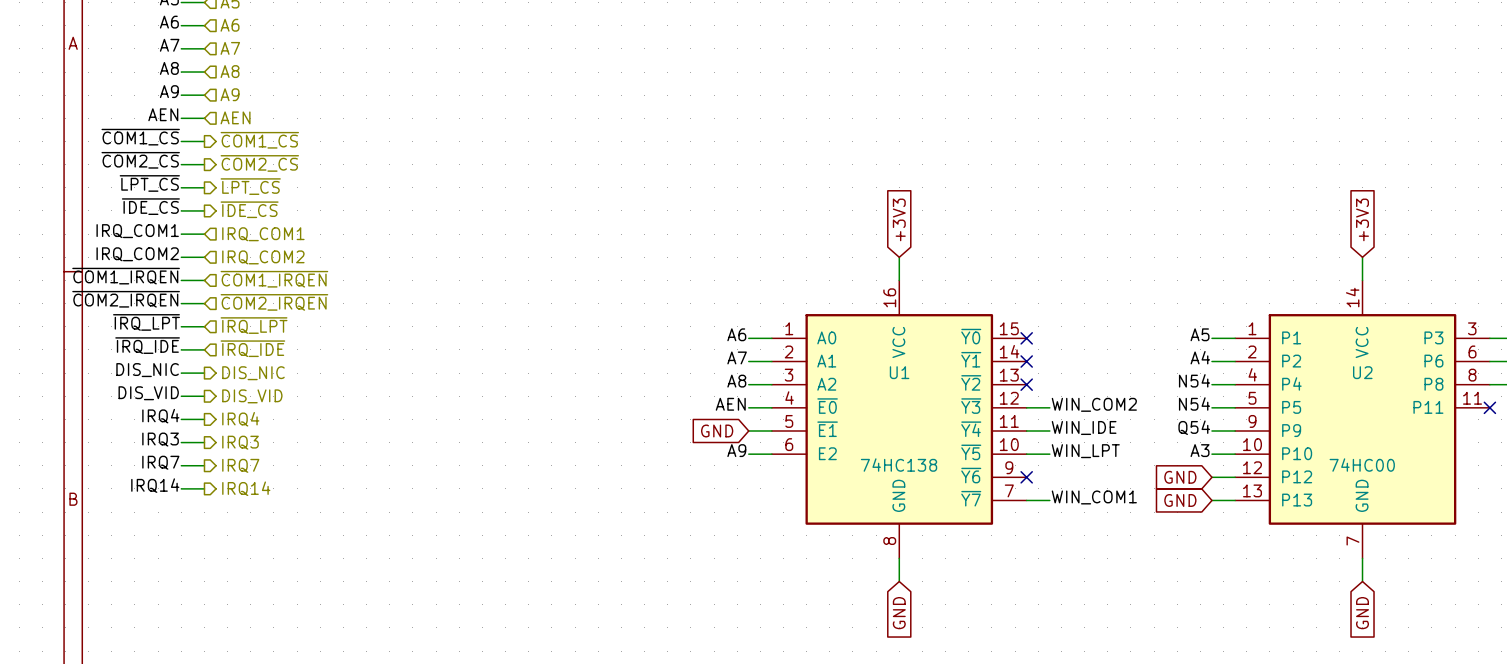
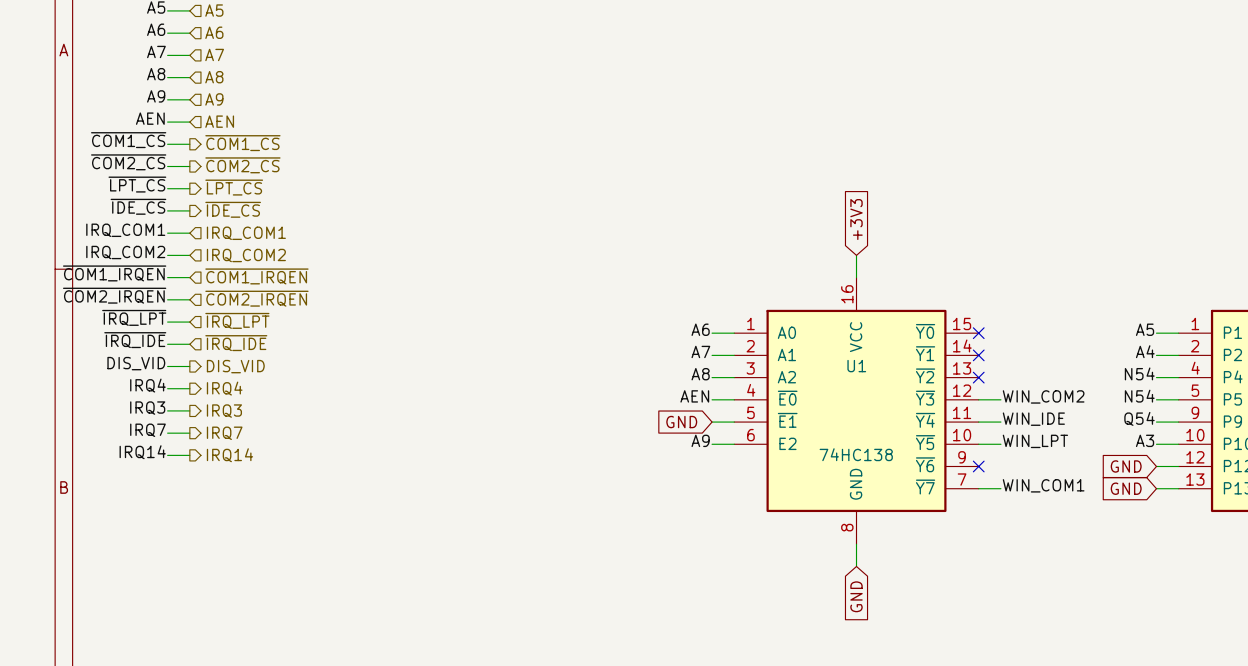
label: DIS_NIC (147, 370) -> DIS_VID (136, 363)
hierarchical label: DIS_NIC (253, 373) -> DIS_VID (235, 366)
label: DIS_VID (148, 393) -> IRQ4 (147, 385)
hierarchical label: DIS_VID (252, 396) -> IRQ4 (224, 388)
label: IRQ4 (160, 416) -> IRQ3 (147, 408)
hierarchical label: IRQ4 (240, 419) -> IRQ3 (224, 411)
label: IRQ3 (160, 439) -> IRQ7 (147, 430)
hierarchical label: IRQ3 (240, 442) -> IRQ7 (224, 433)
label: IRQ7 (160, 462) -> IRQ14 (142, 452)
hierarchical label: IRQ7 (240, 465) -> IRQ14 (229, 455)
label: IRQ14 (155, 485) -> none
wire: (181, 488) (204, 488) -> none
hierarchical label: IRQ14 (246, 488) -> none

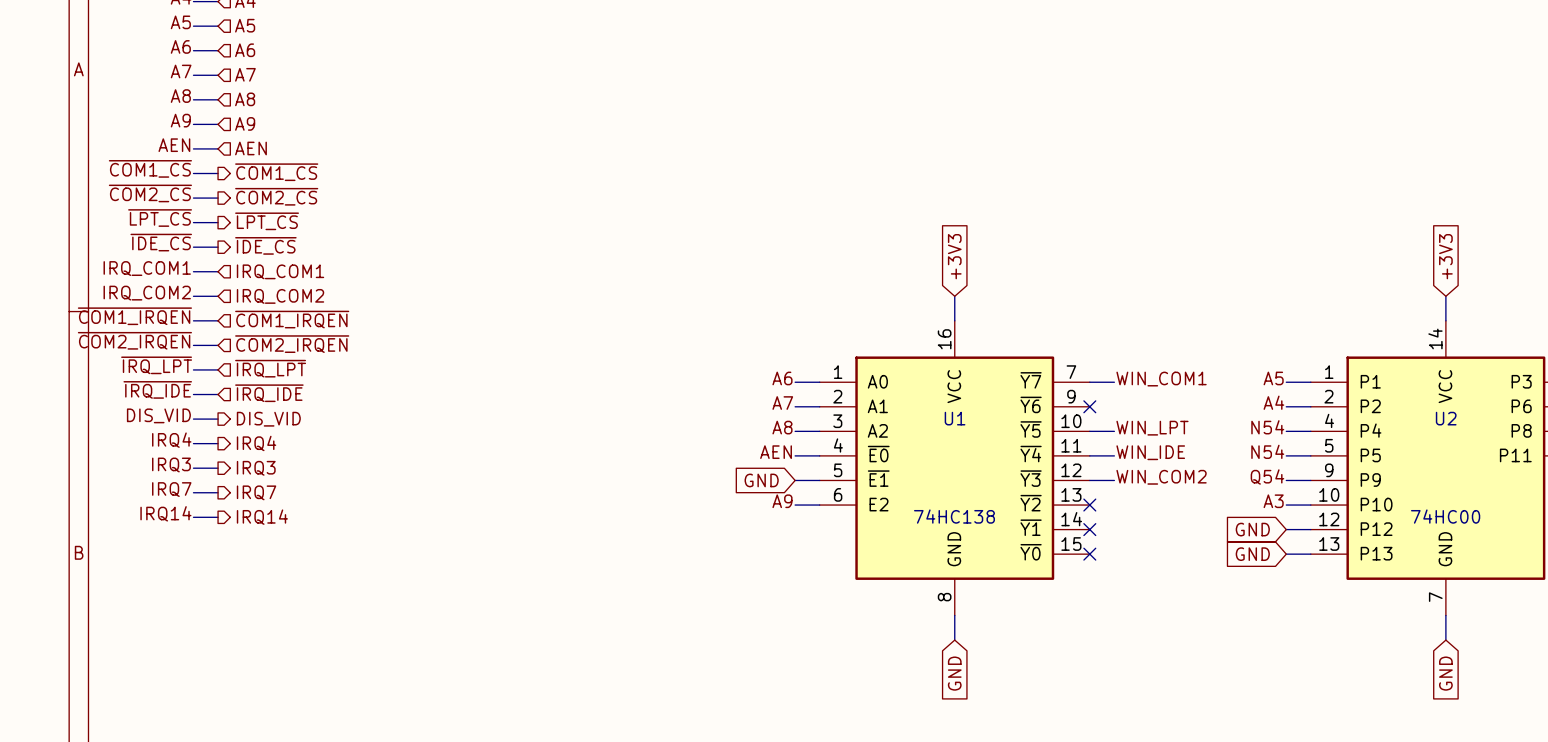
U1 symbol: [734, 277, 979, 545] -> [819, 320, 1090, 616]
no-connect mark: (978, 333) -> none
no-connect mark: (978, 377) -> none
label: WIN_COM2 (1043, 396) -> WIN_IDE (1150, 452)
label: WIN_IDE (1033, 419) -> WIN_COM2 (1161, 477)
label position: WIN_LPT (1035, 441) -> WIN_LPT (1152, 428)
wire: (978, 444) (1000, 444) -> (1089, 382) (1114, 382)
no-connect mark: none -> (1089, 505)
label position: WIN_COM1 (1043, 485) -> WIN_COM1 (1161, 379)
wire: (978, 488) (1000, 488) -> (1089, 431) (1114, 431)
no-connect mark: none -> (1089, 554)

